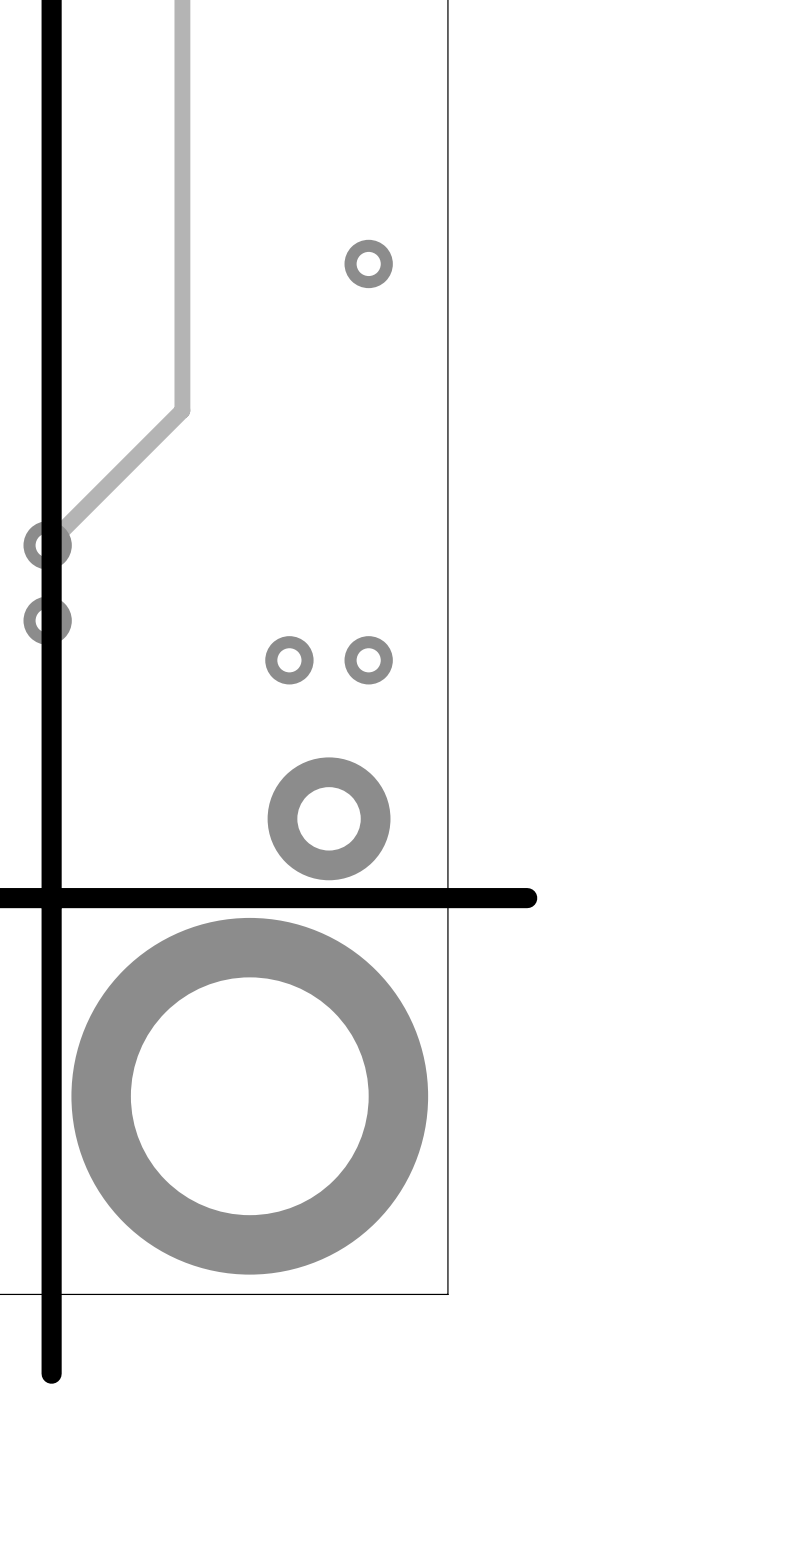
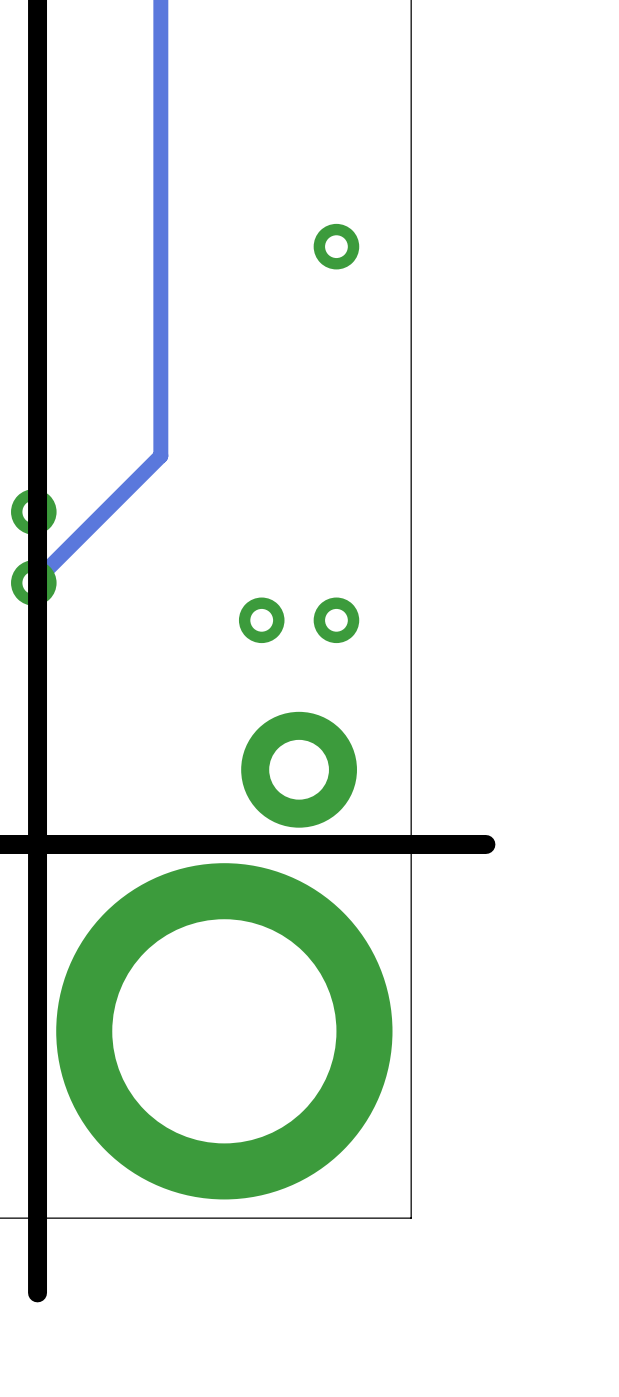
track: (182, 410) (47, 545) -> (160, 384) (160, 455) (33, 582)

